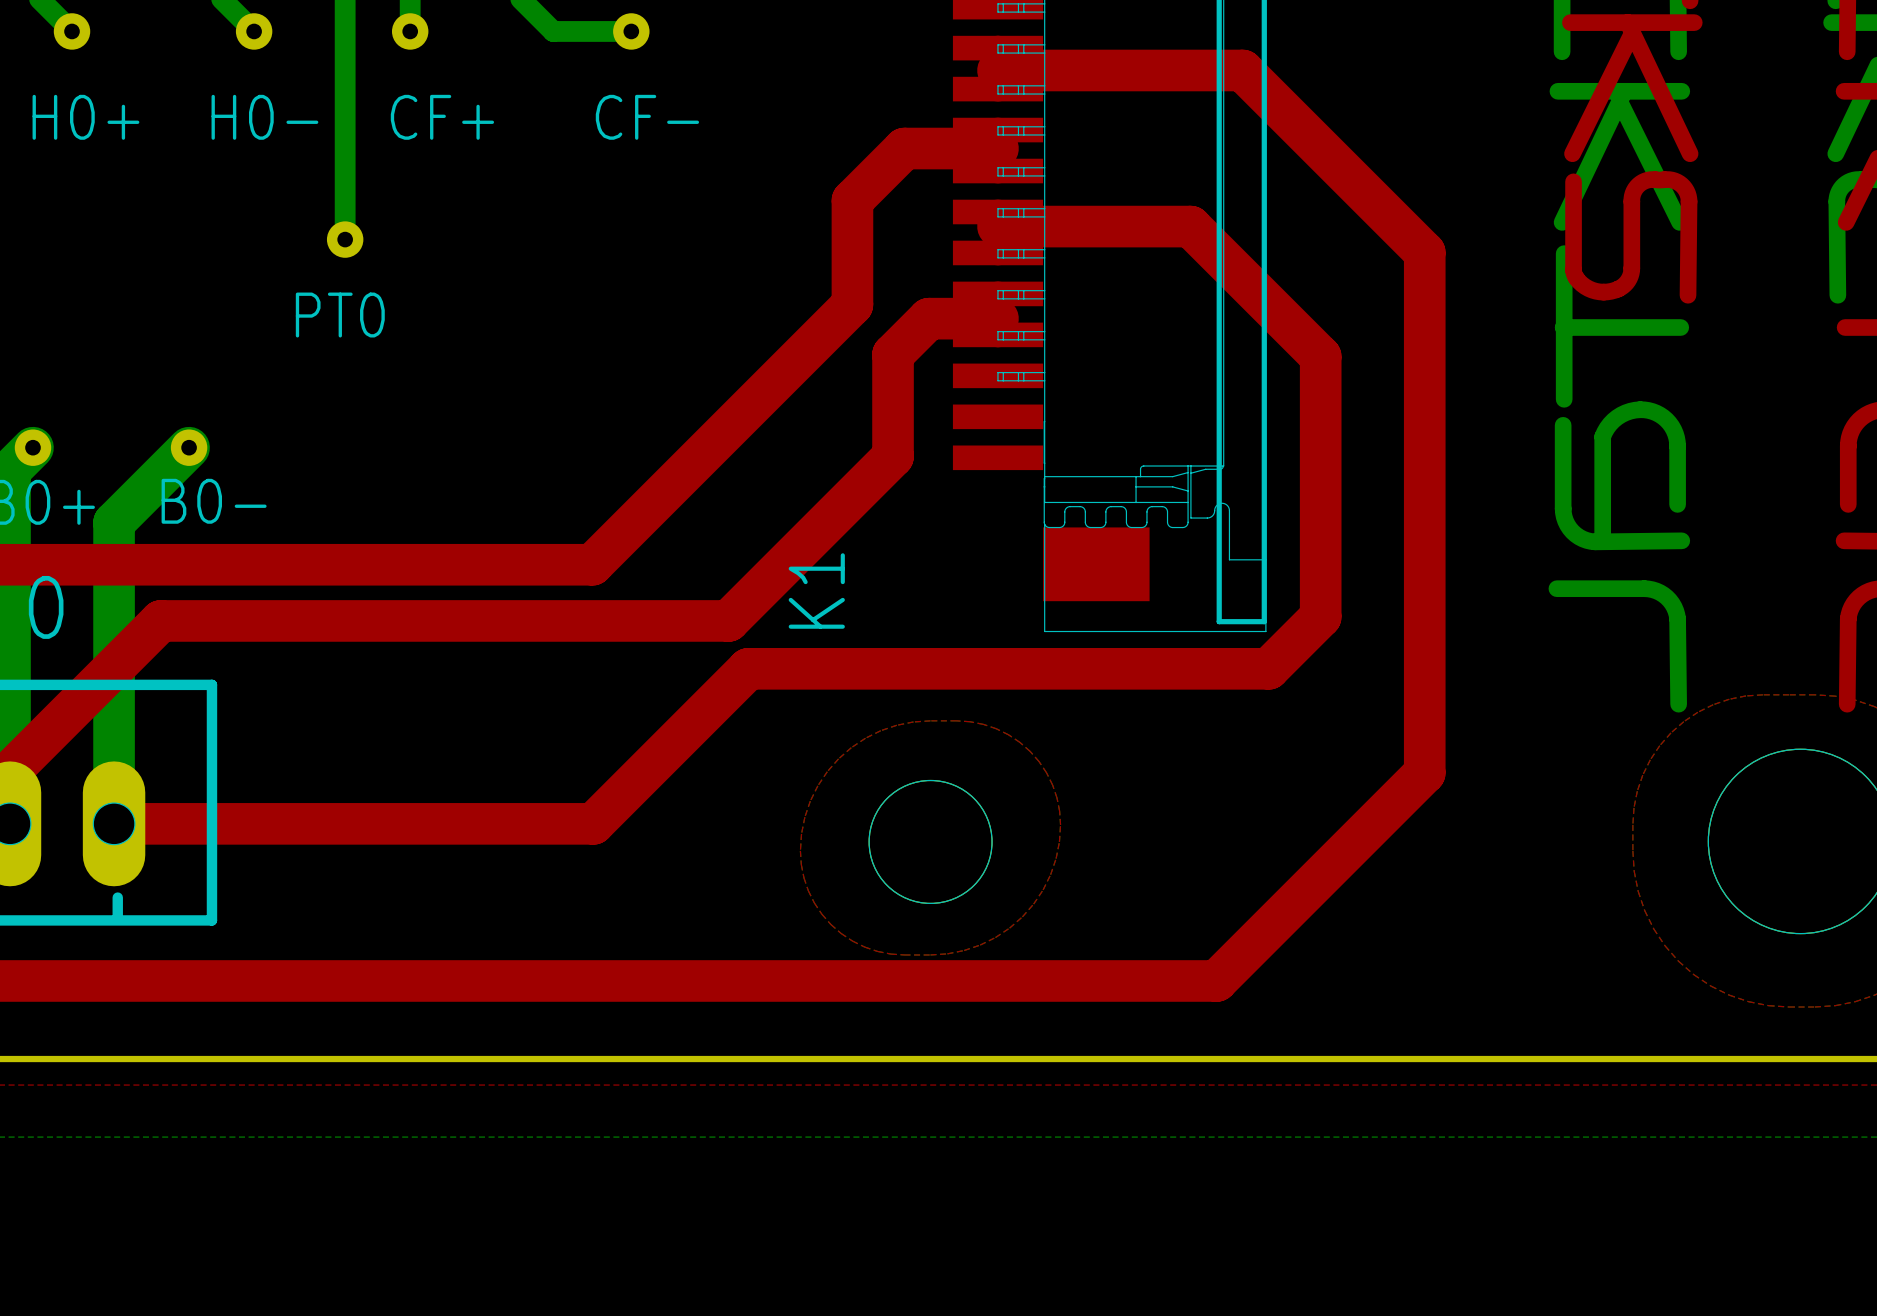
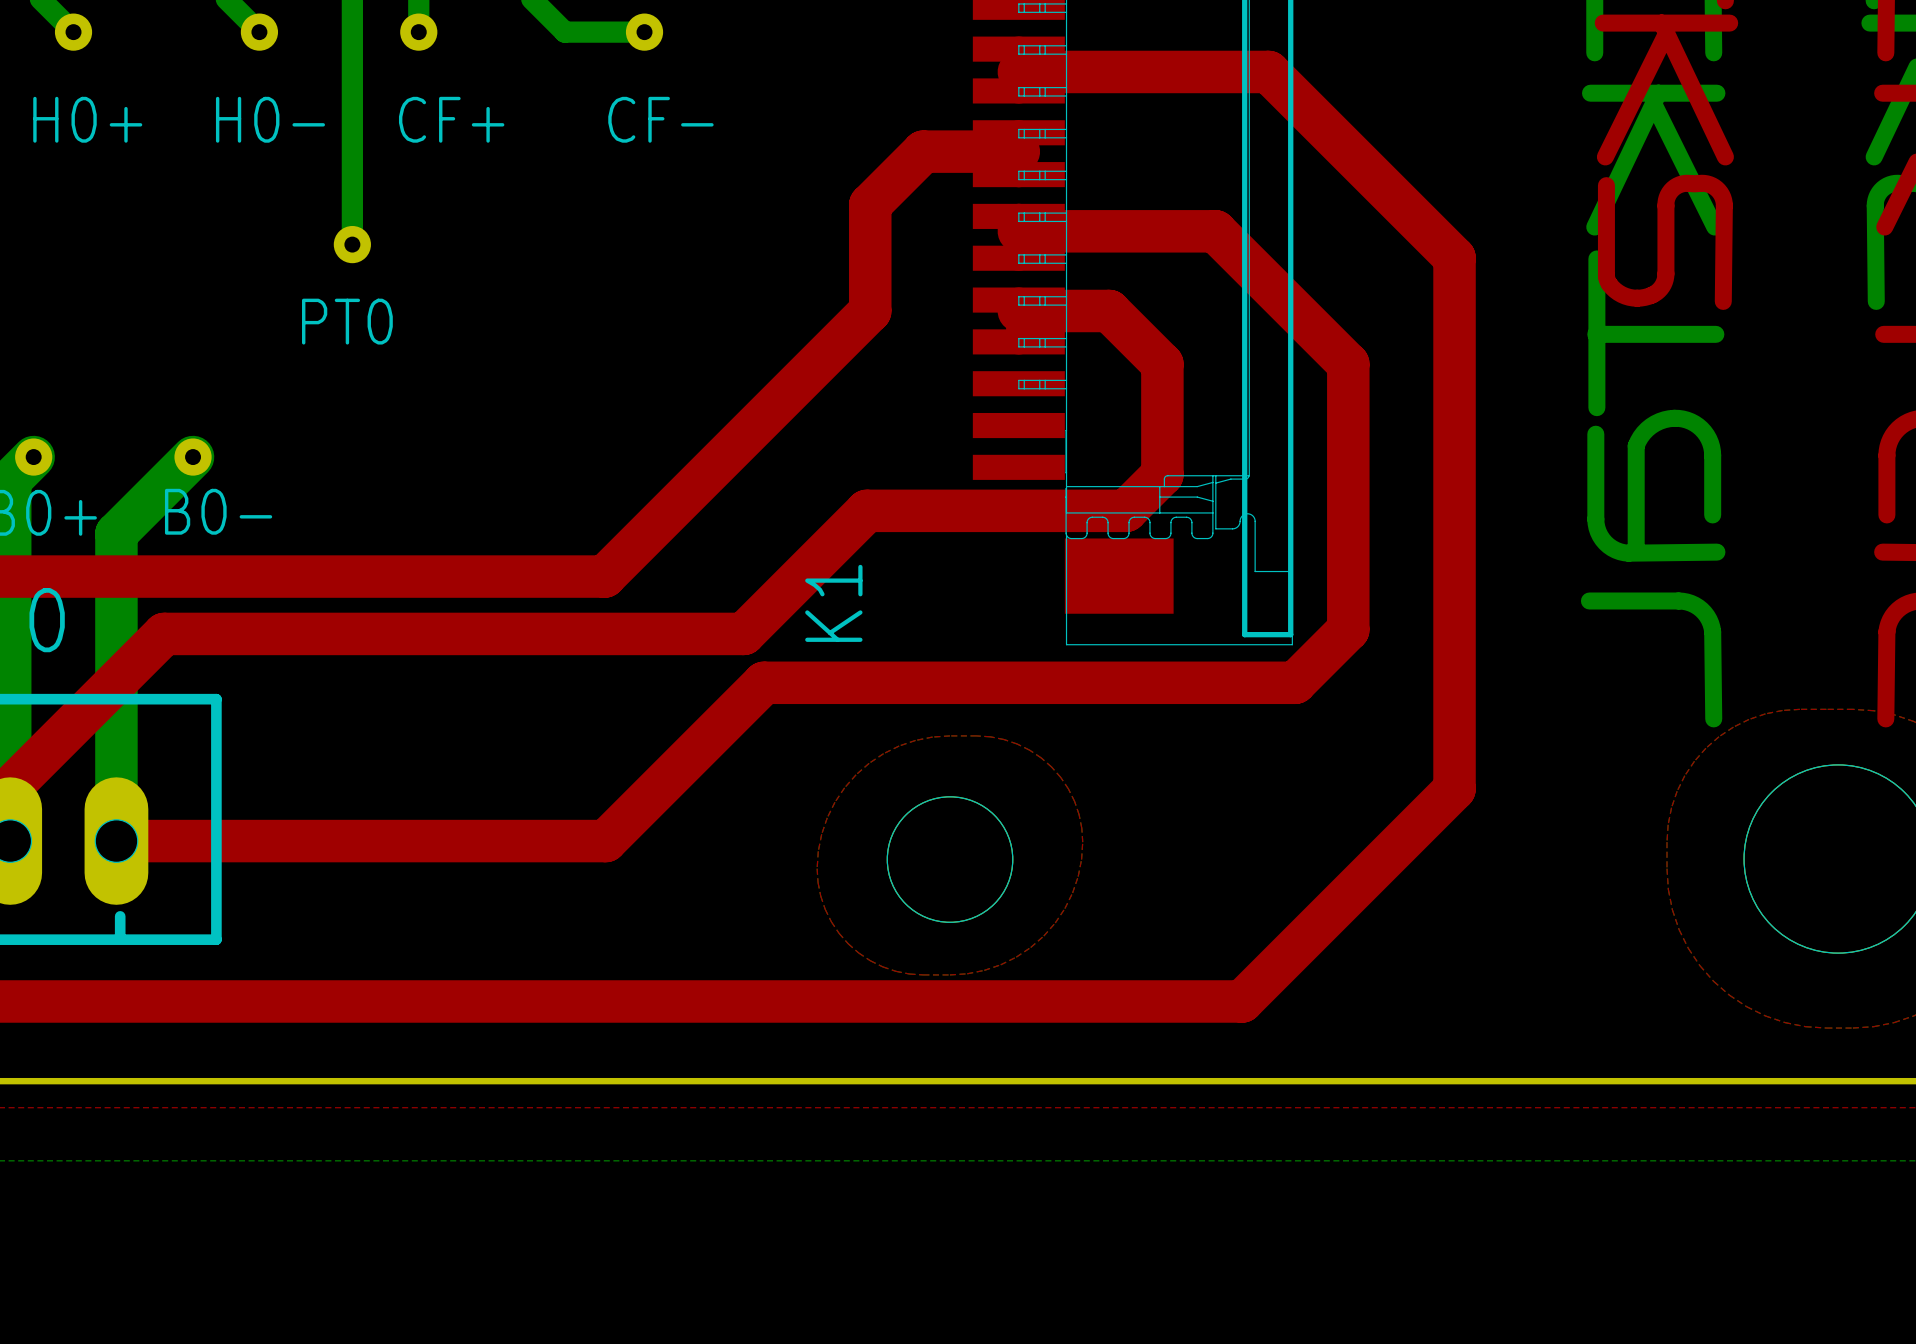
top track: (997, 318) (928, 318) (893, 354) (893, 456) (849, 500) -> (1018, 310) (1109, 310) (1162, 364) (1162, 474) (1126, 510) (866, 510)

